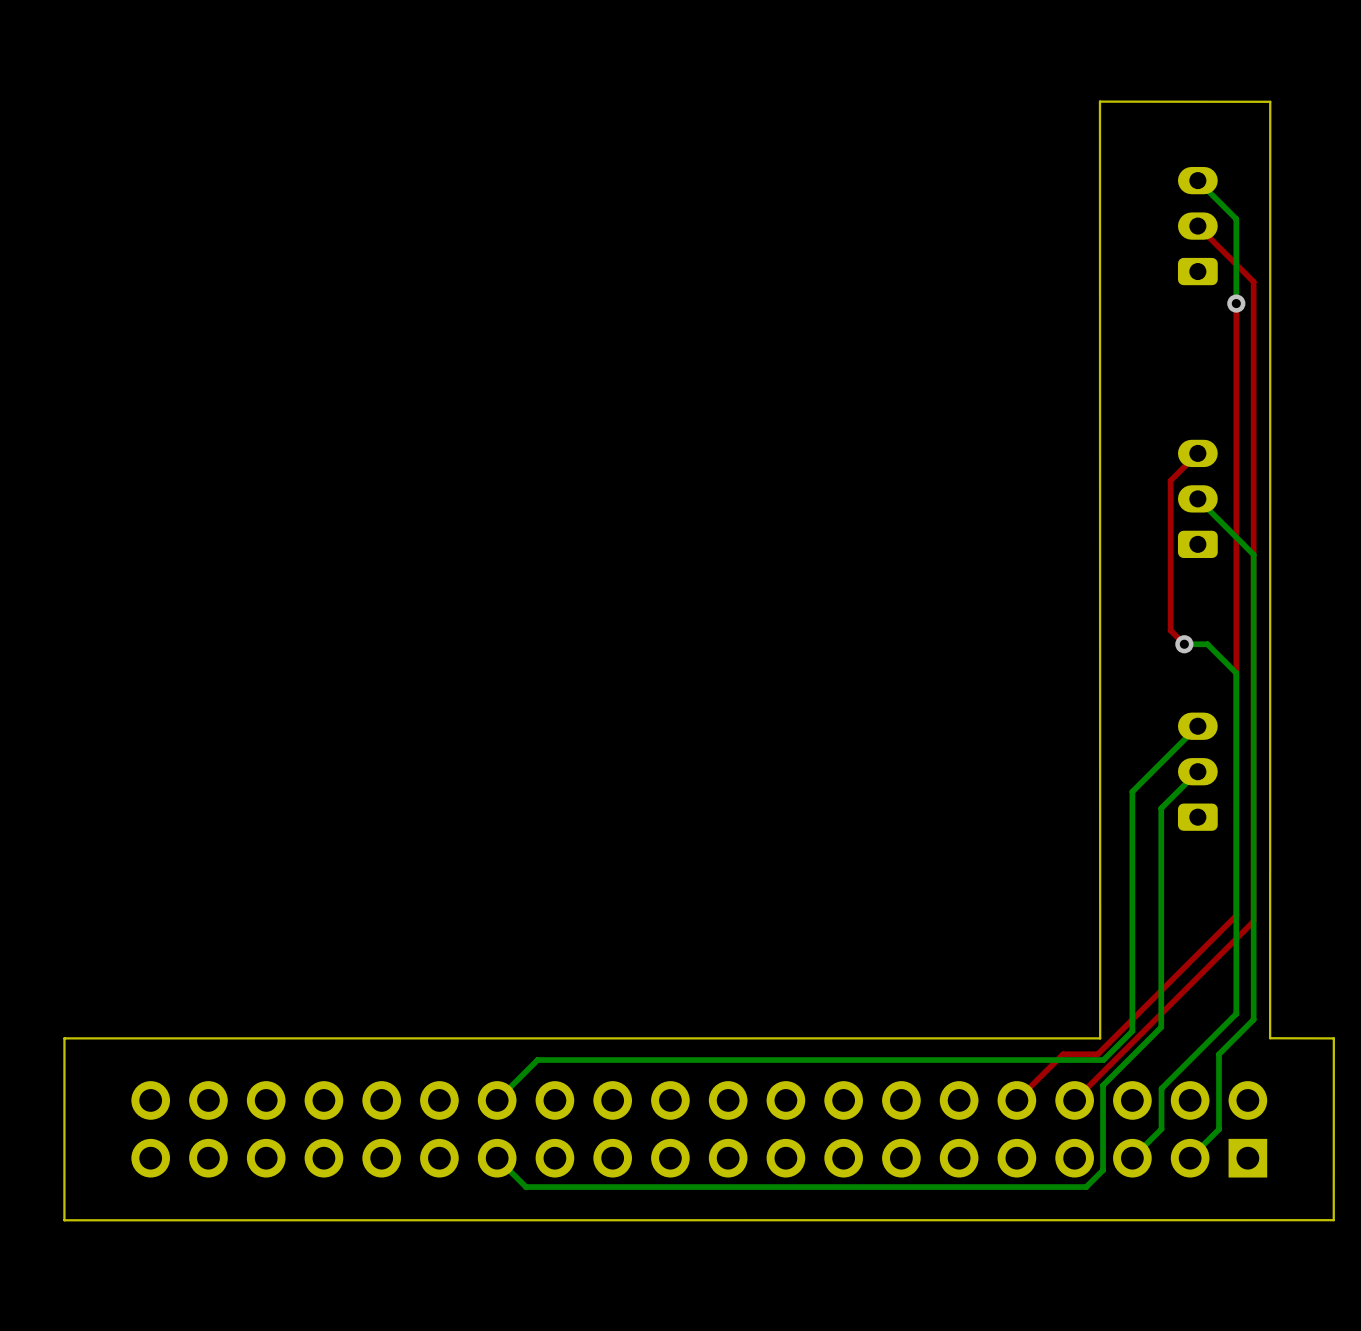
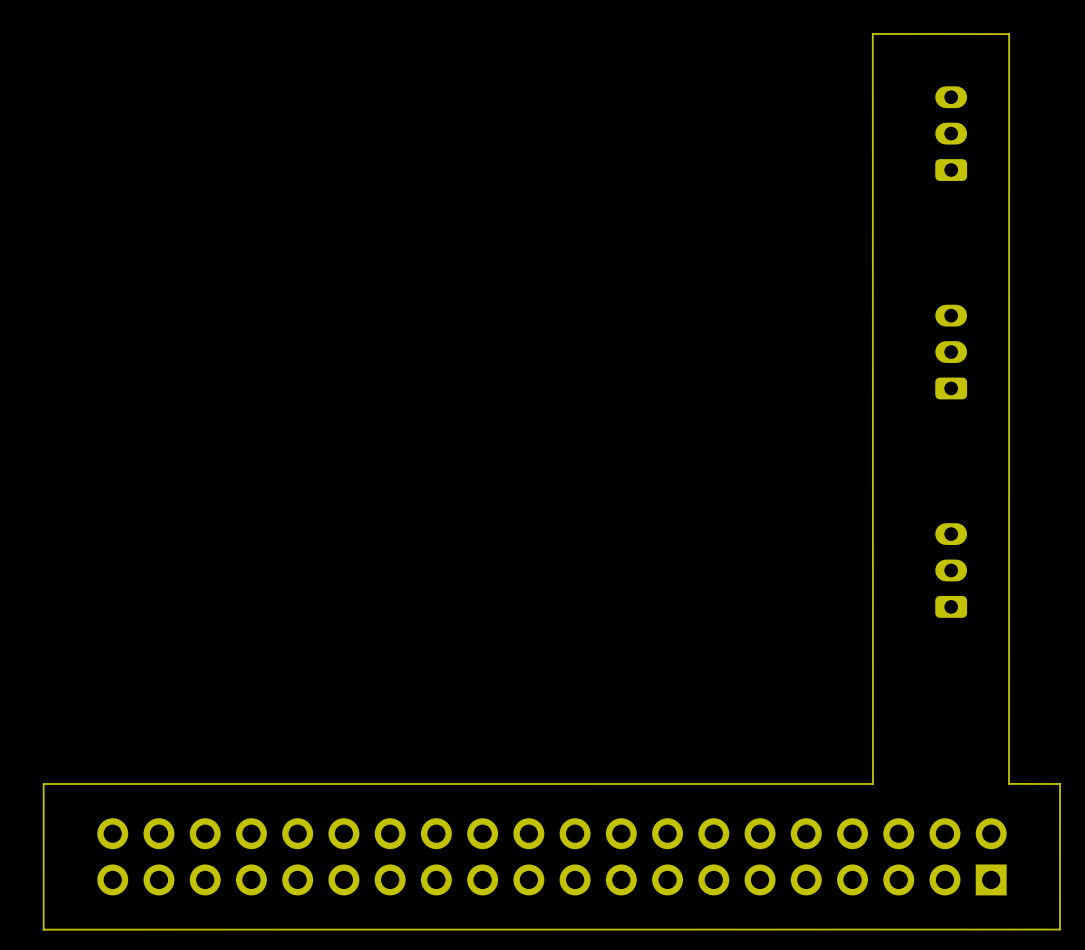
bottom track: (1197, 180) (1236, 219) (1236, 303) -> none
top track: (1197, 226) (1253, 281) (1253, 921) (1074, 1100) -> none
top track: (1236, 303) (1236, 915) (1097, 1054) (1063, 1054) (1016, 1100) -> none
via: (1236, 303) -> none
top track: (1197, 453) (1170, 480) (1170, 630) (1184, 644) -> none
bottom track: (1197, 498) (1253, 554) (1253, 1019) (1219, 1054) (1219, 1129) (1190, 1158) -> none
bottom track: (1184, 644) (1207, 644) (1236, 673) (1236, 1013) (1161, 1088) (1161, 1129) (1132, 1158) -> none
via: (1184, 644) -> none
bottom track: (1197, 726) (1132, 791) (1132, 1031) (1103, 1060) (537, 1060) (497, 1100) -> none
bottom track: (1197, 771) (1161, 808) (1161, 1027) (1103, 1085) (1103, 1170) (1086, 1187) (526, 1187) (497, 1158) -> none

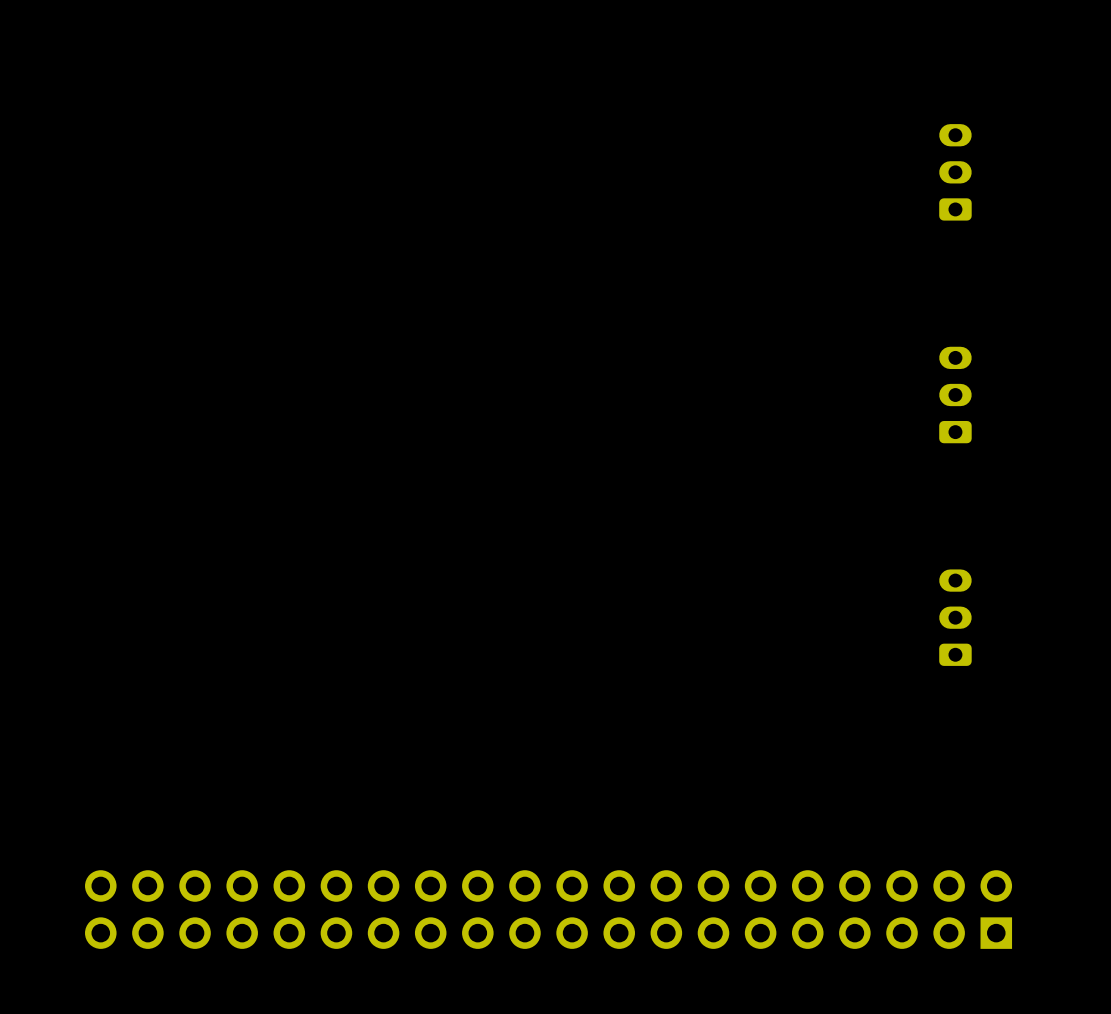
board edge: (872, 33) (1009, 34) (1009, 783) (1060, 784) (1059, 929) (43, 929) (43, 784) (872, 784) (872, 33) -> none

